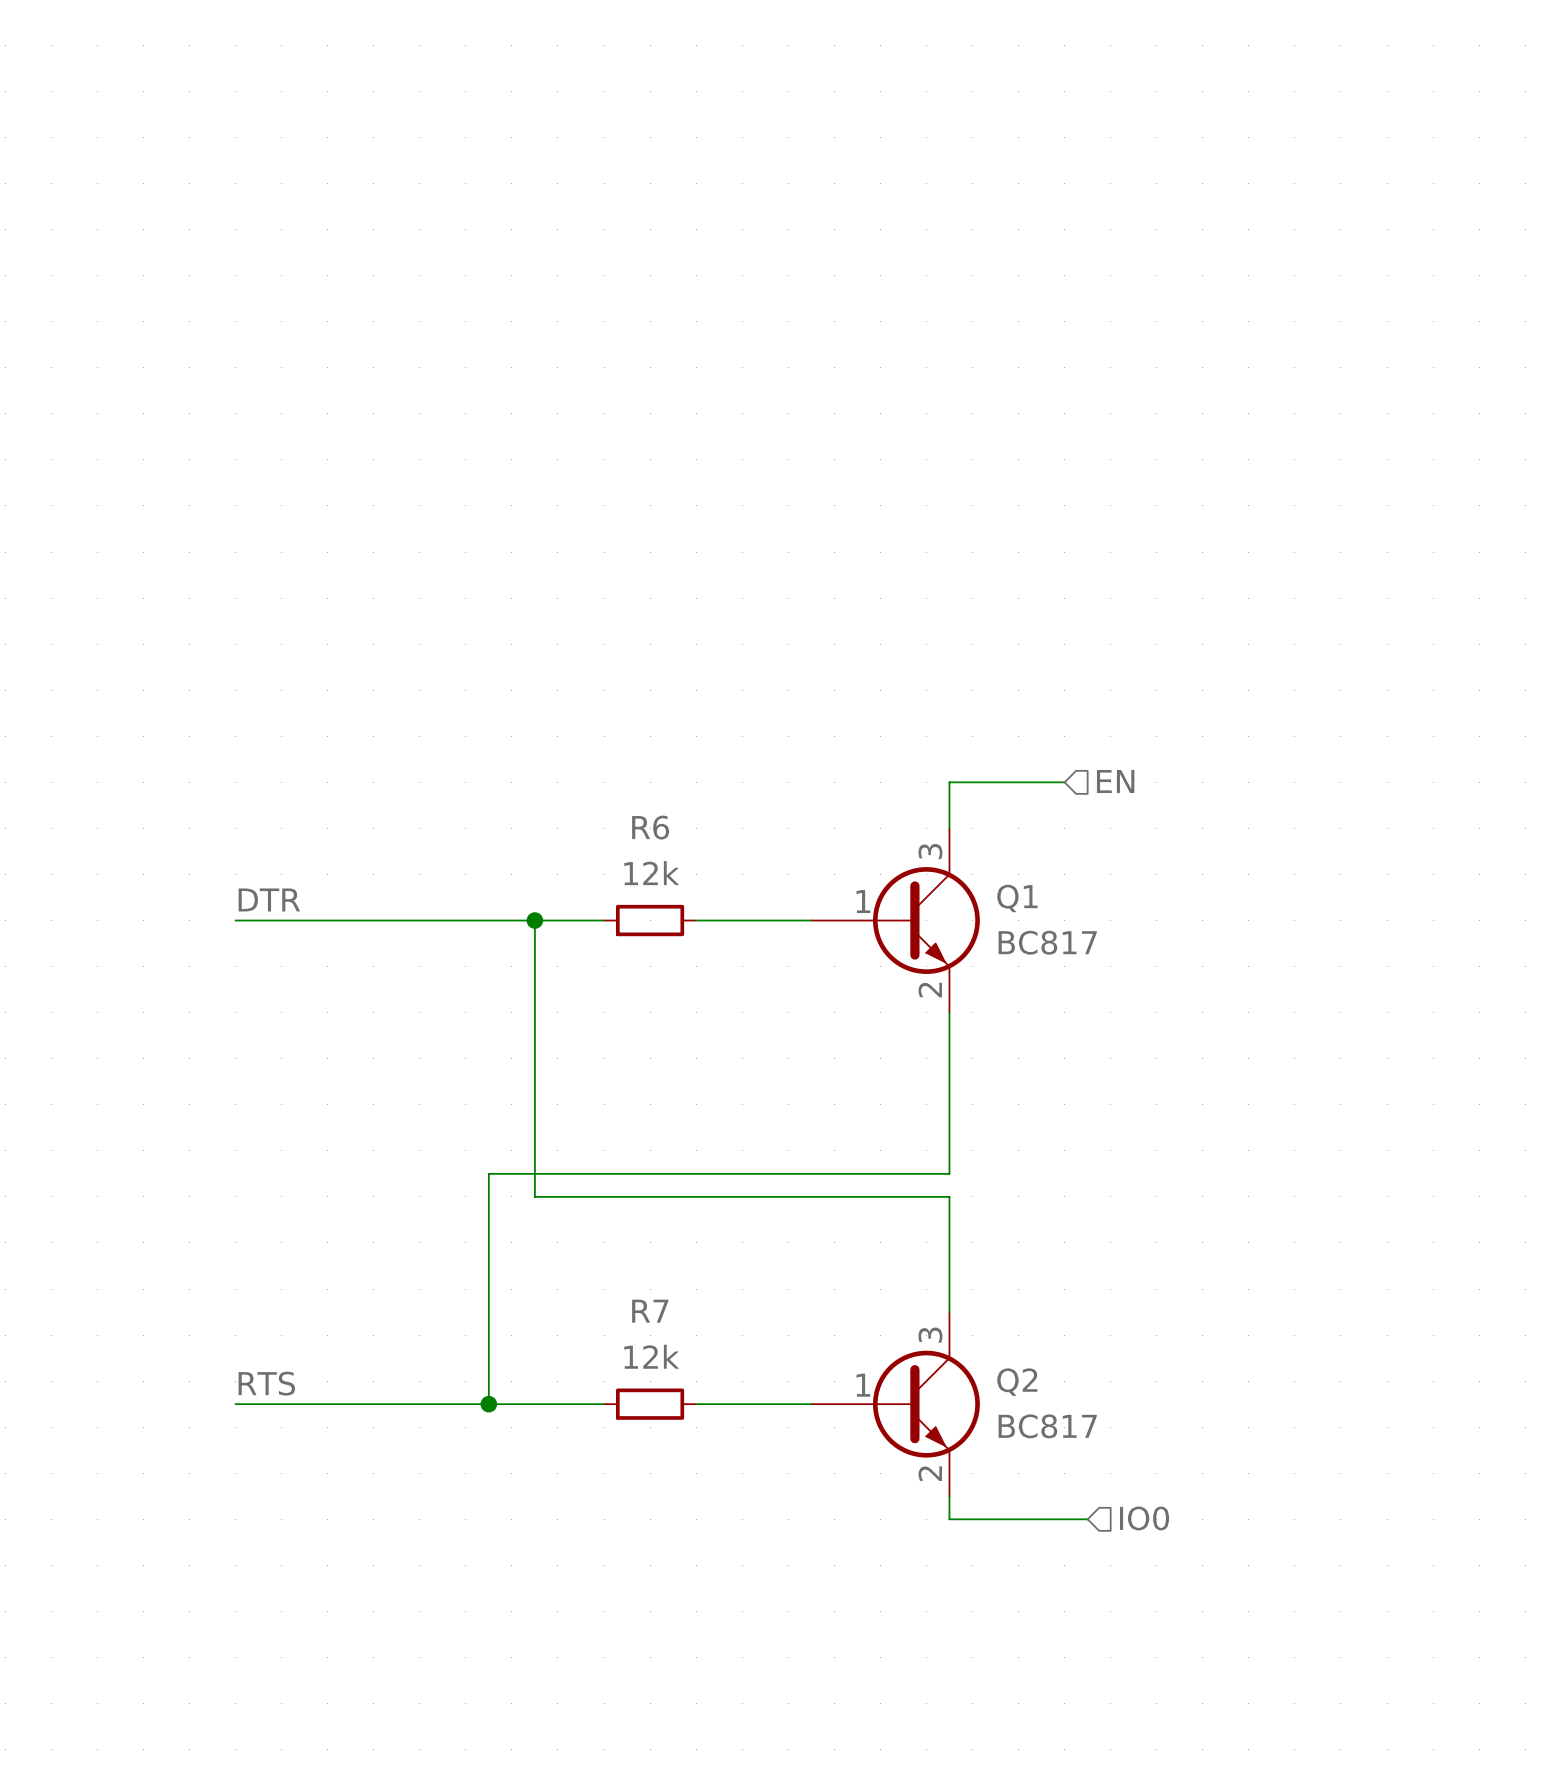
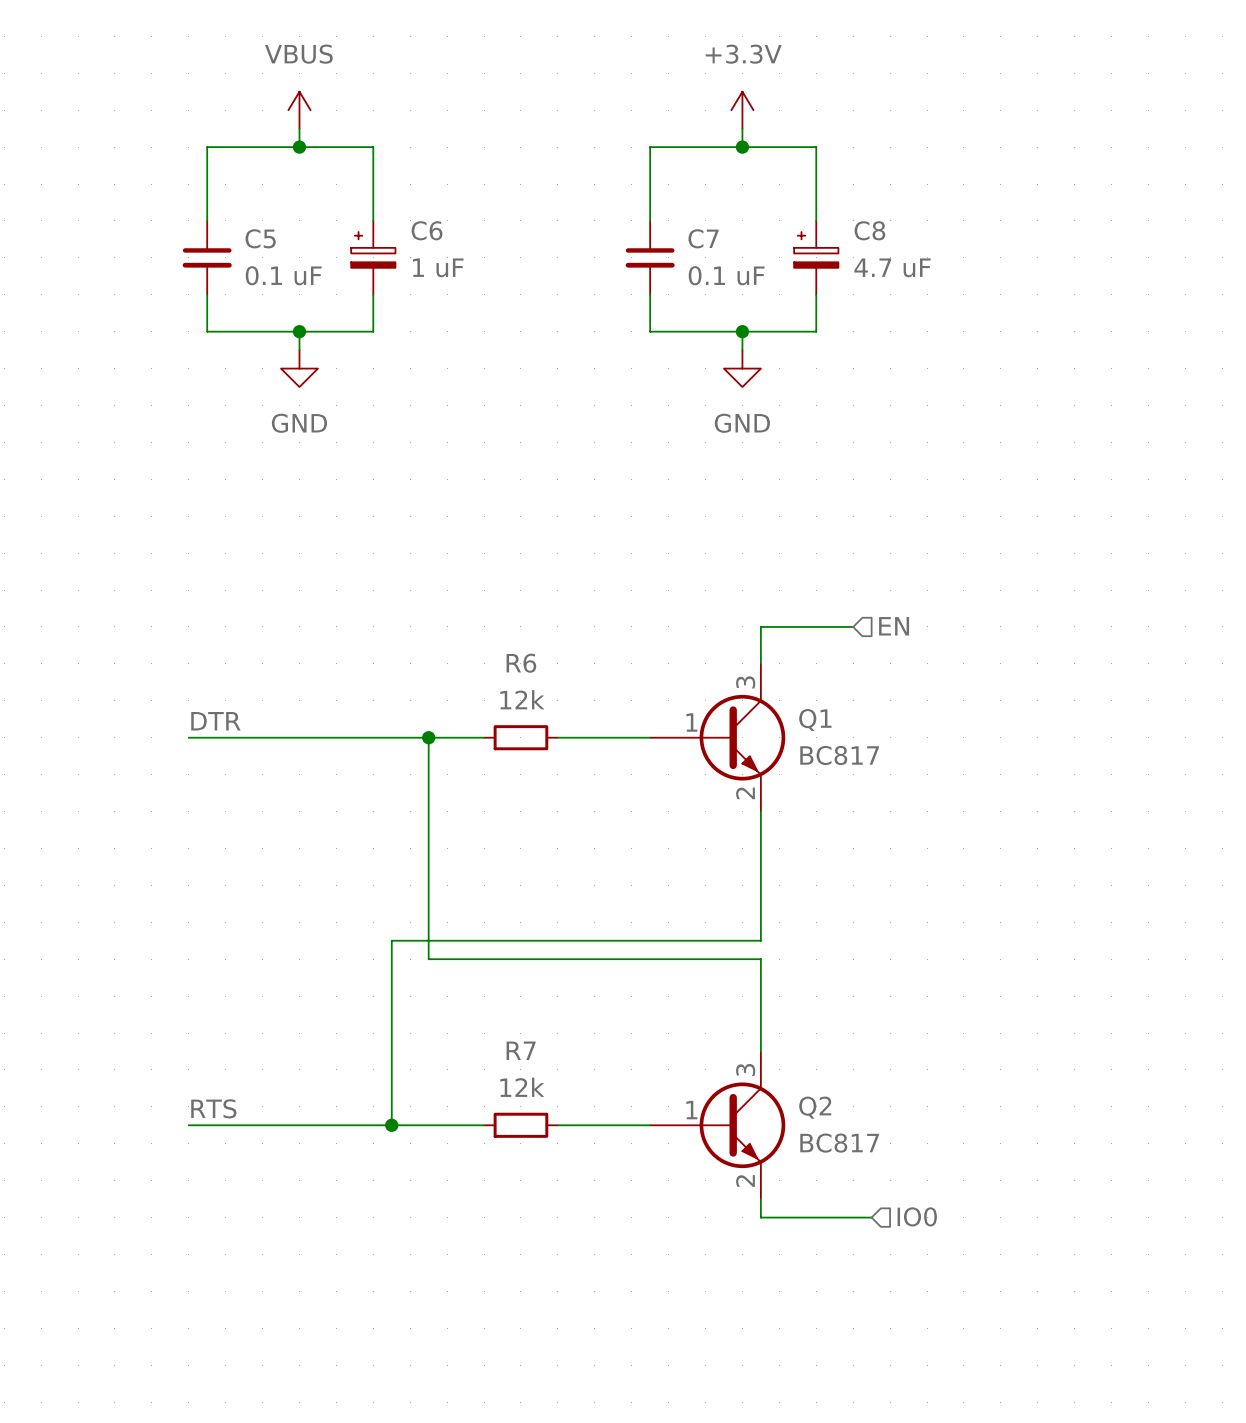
power symbol: none -> VBUS (299, 110)
power symbol: none -> +3.3V (742, 110)
wire: none -> (299, 128) (299, 147)
wire: none -> (742, 128) (742, 147)
junction: none -> (299, 147)
junction: none -> (742, 147)
wire: none -> (207, 220) (207, 147) (373, 147) (373, 220)
wire: none -> (650, 220) (650, 147) (816, 147) (816, 220)
C5: none -> 0.1 uF (207, 257)
C6: none -> 1 uF (373, 257)
C7: none -> 0.1 uF (650, 257)
C8: none -> 4.7 uF (816, 257)
wire: none -> (207, 294) (207, 331) (373, 331) (373, 294)
wire: none -> (650, 294) (650, 331) (816, 331) (816, 294)
wire: none -> (299, 331) (299, 350)
junction: none -> (299, 331)
wire: none -> (742, 331) (742, 350)
junction: none -> (742, 331)
power symbol: none -> GND (299, 368)
power symbol: none -> GND (742, 368)

